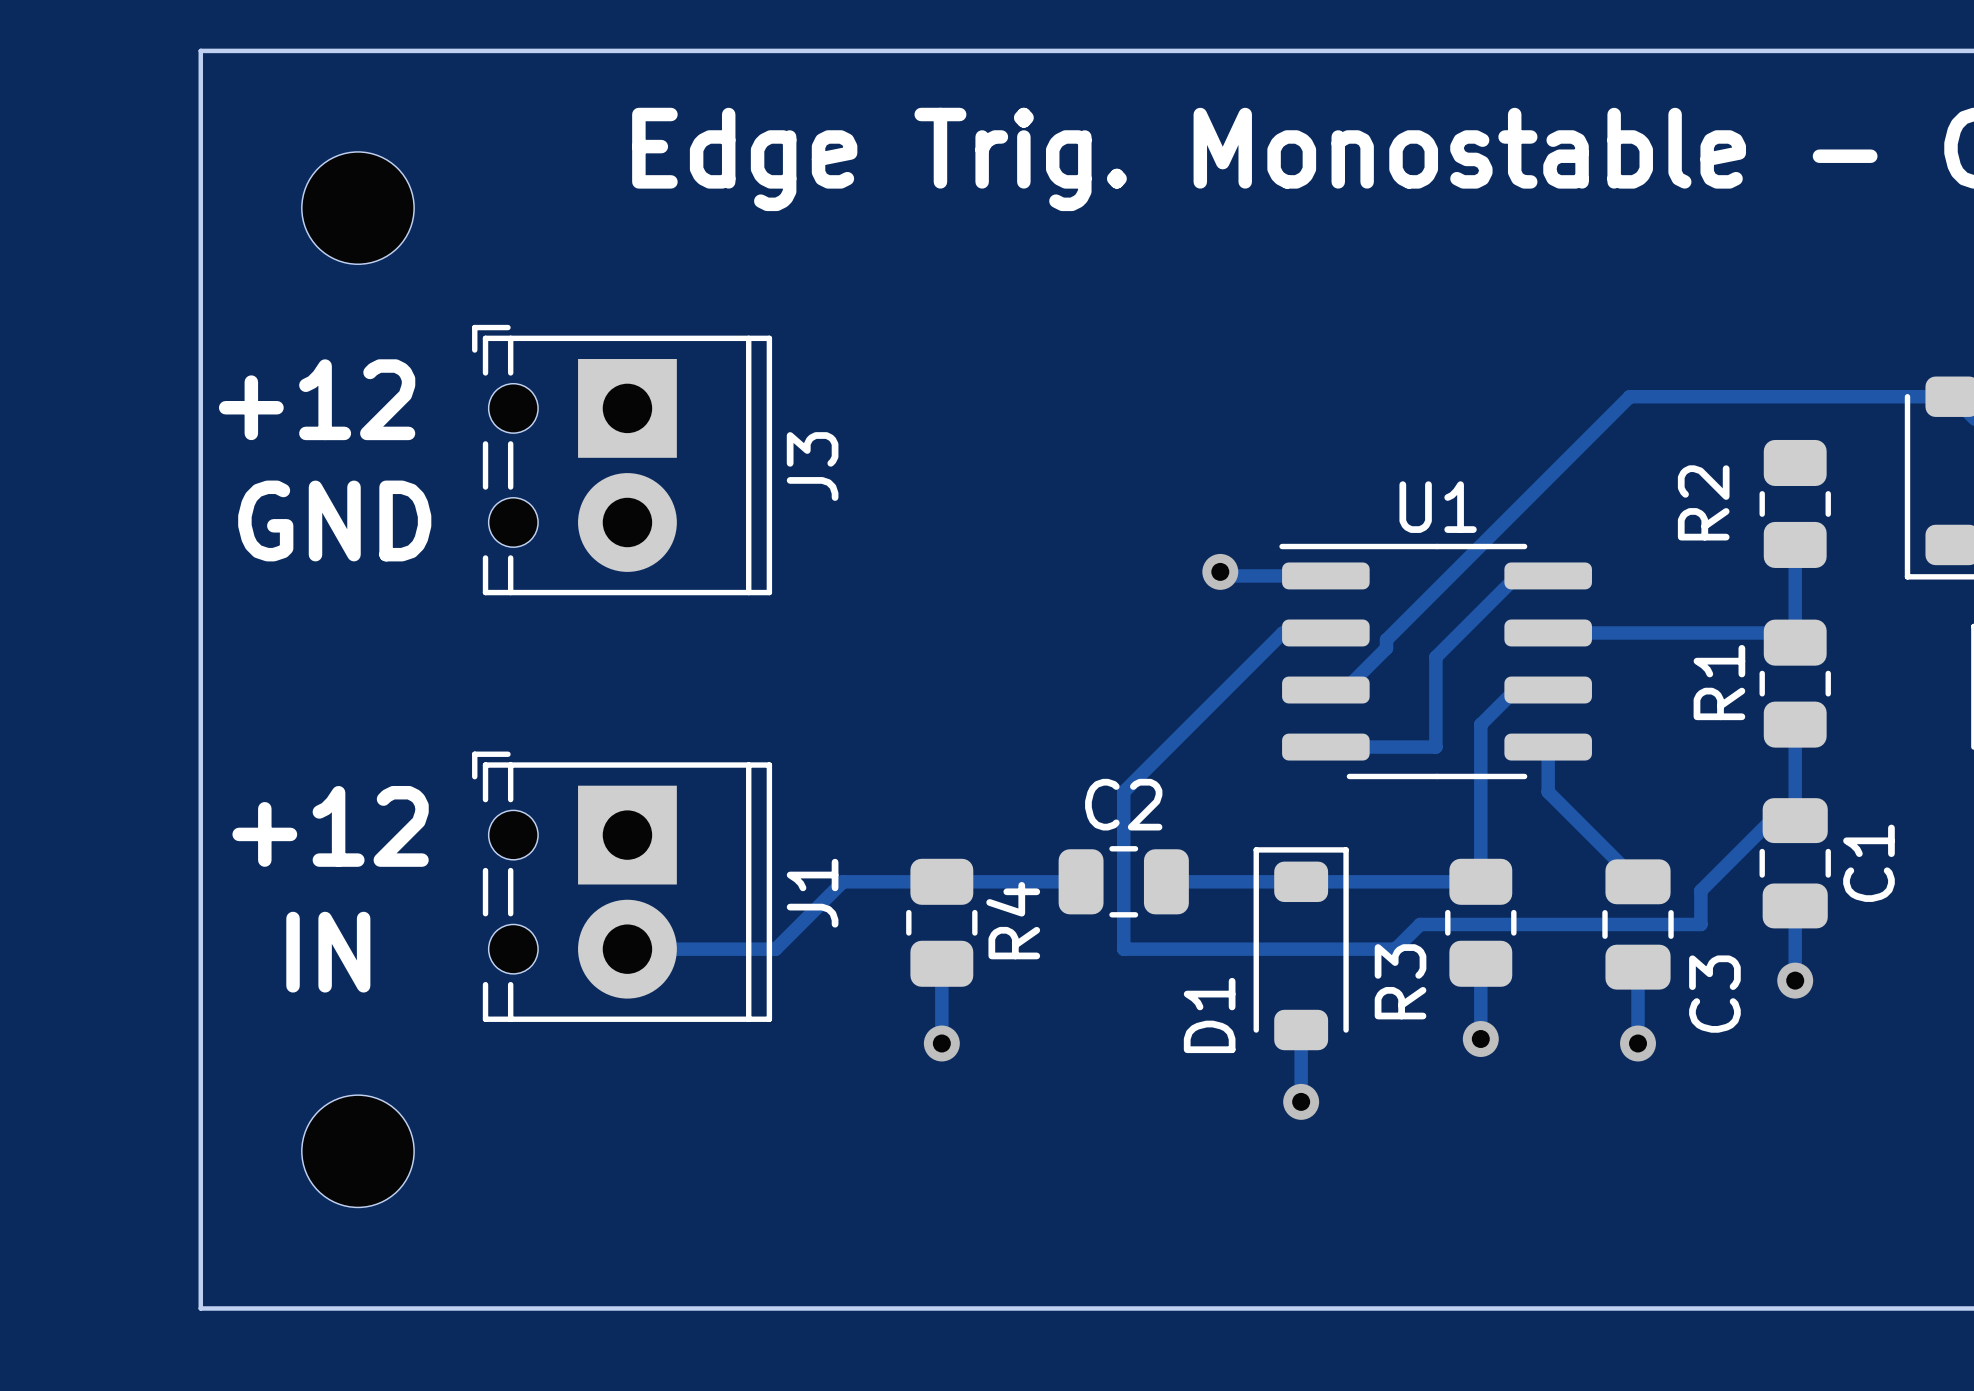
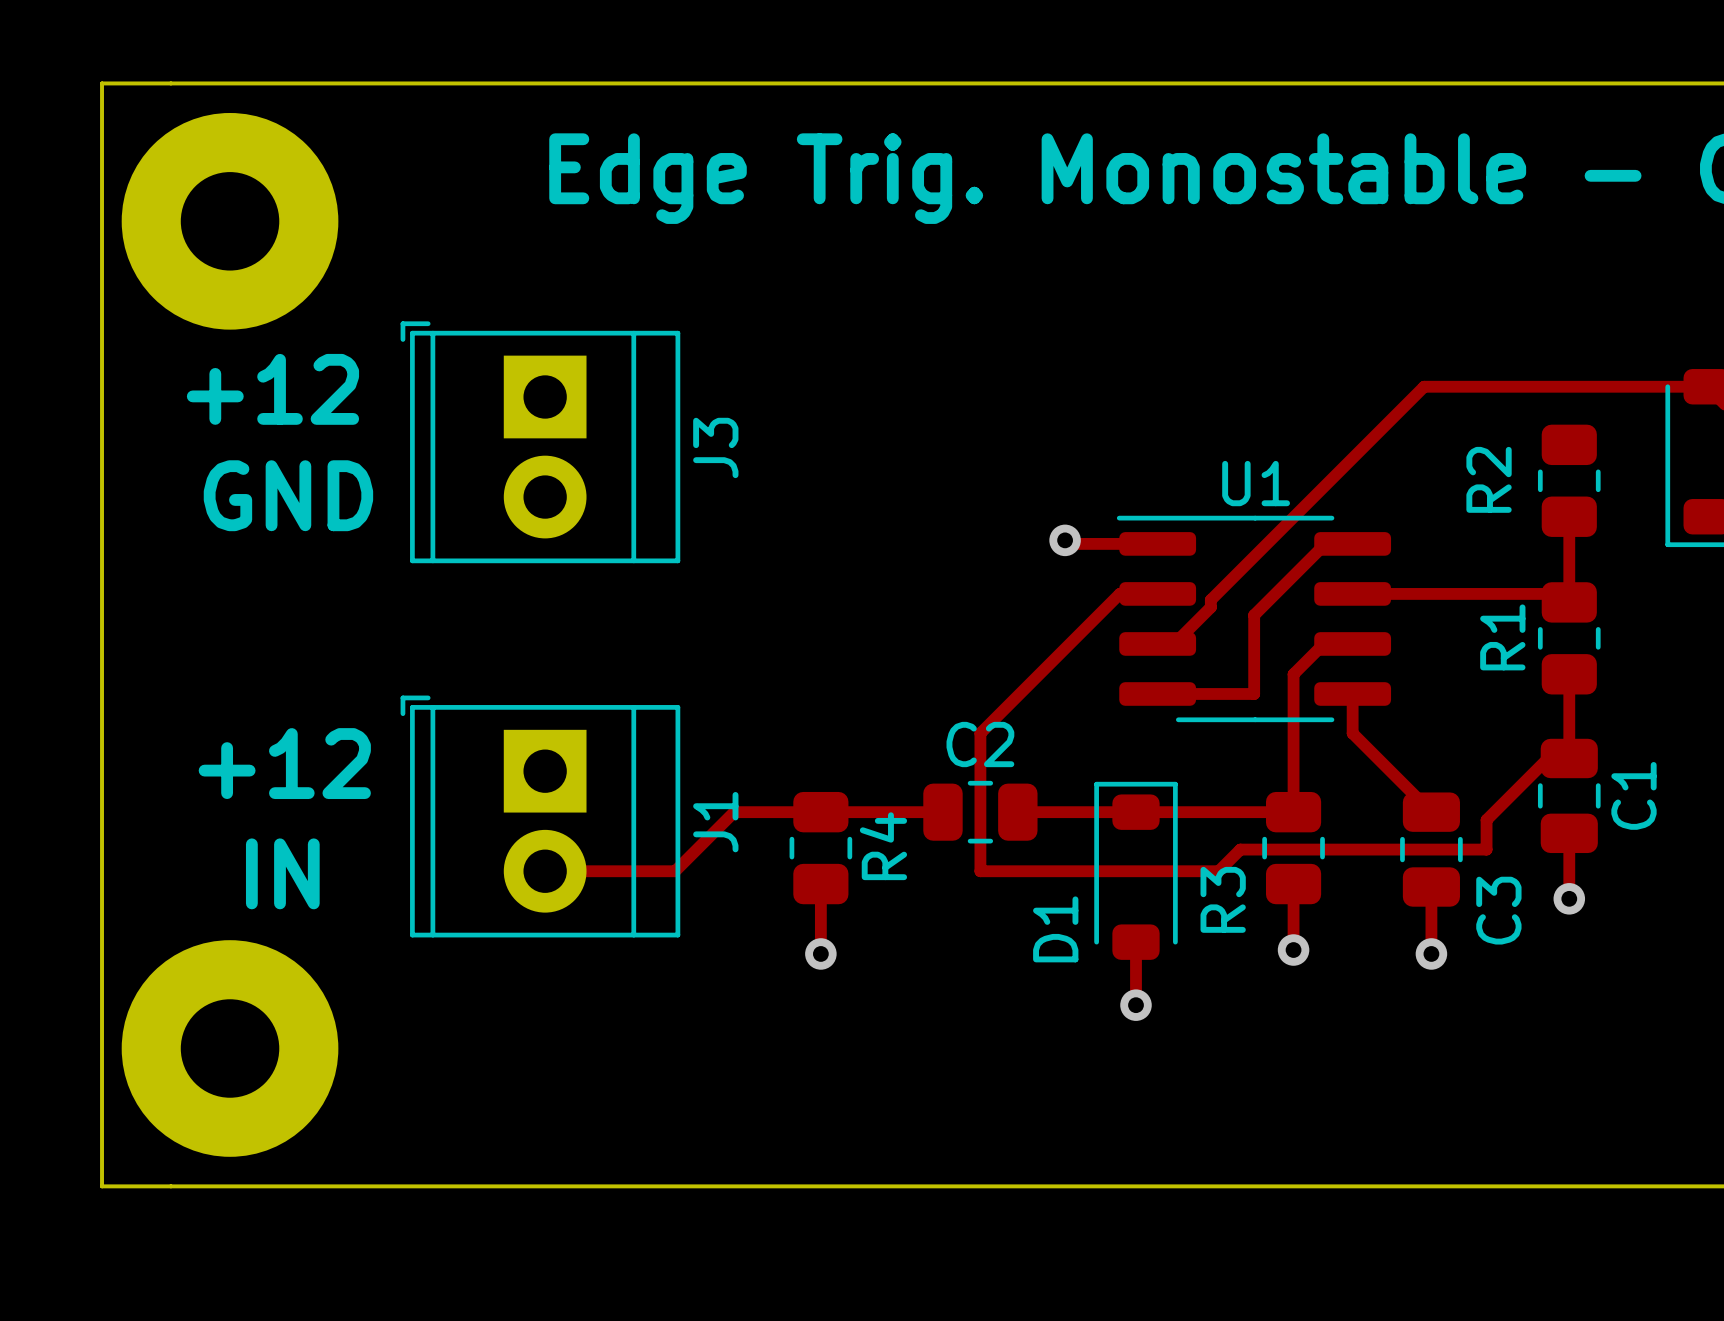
board edge: (200, 50) (200, 1308) -> (170, 83) (102, 83) (102, 1186) (170, 1186)
part: none -> (230, 221)
part: (357, 208) -> none
J3 footprint: [472, 324, 773, 596] -> [400, 321, 681, 564]
J1 footprint: [472, 751, 773, 1022] -> [400, 695, 681, 938]
part: none -> (230, 1048)
part: (357, 1151) -> none

